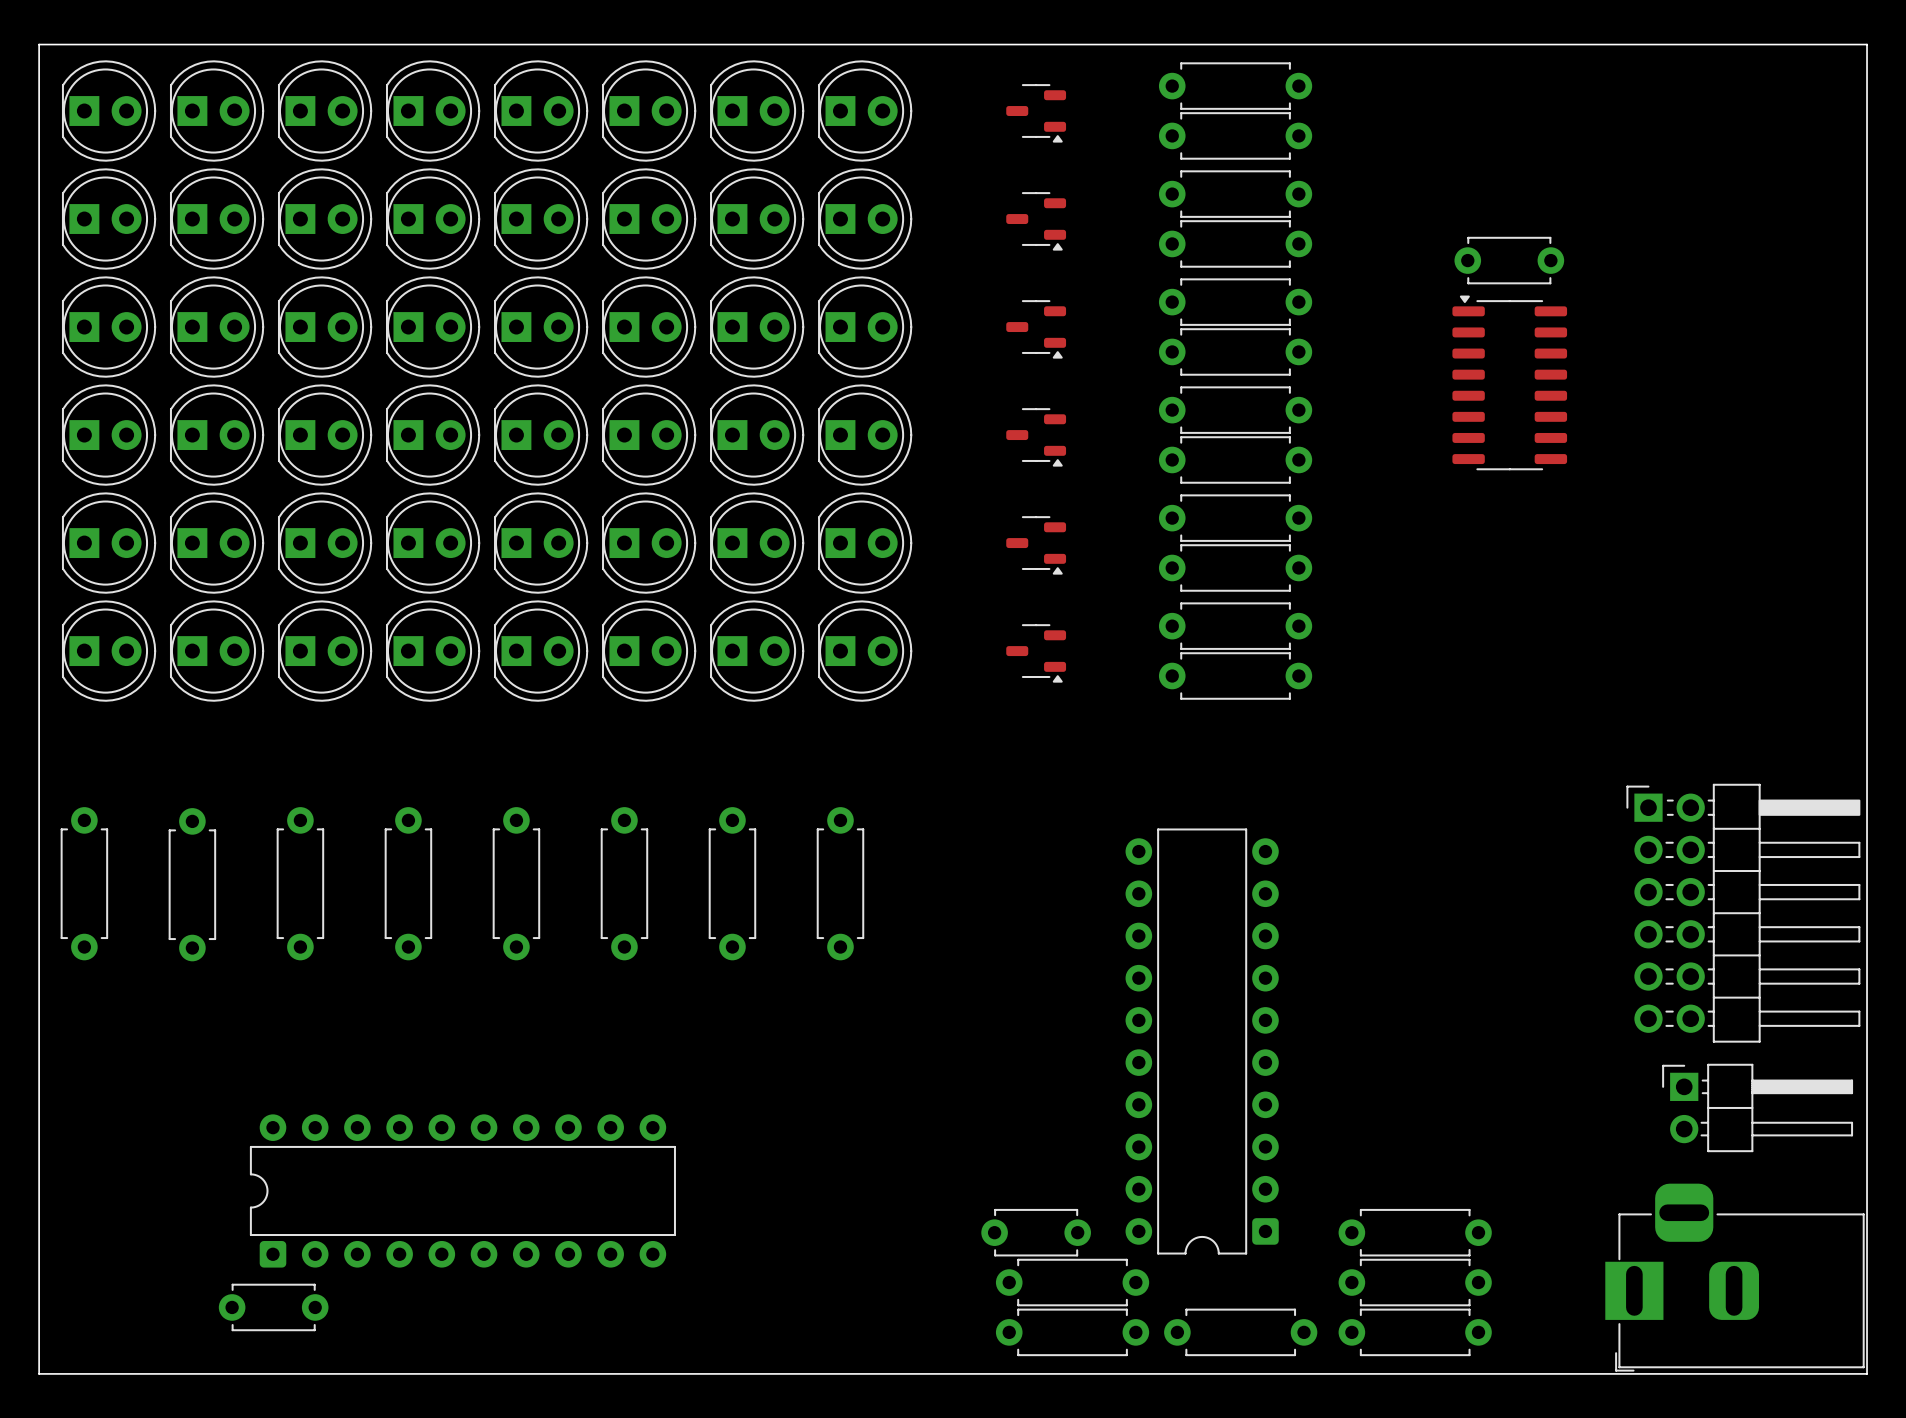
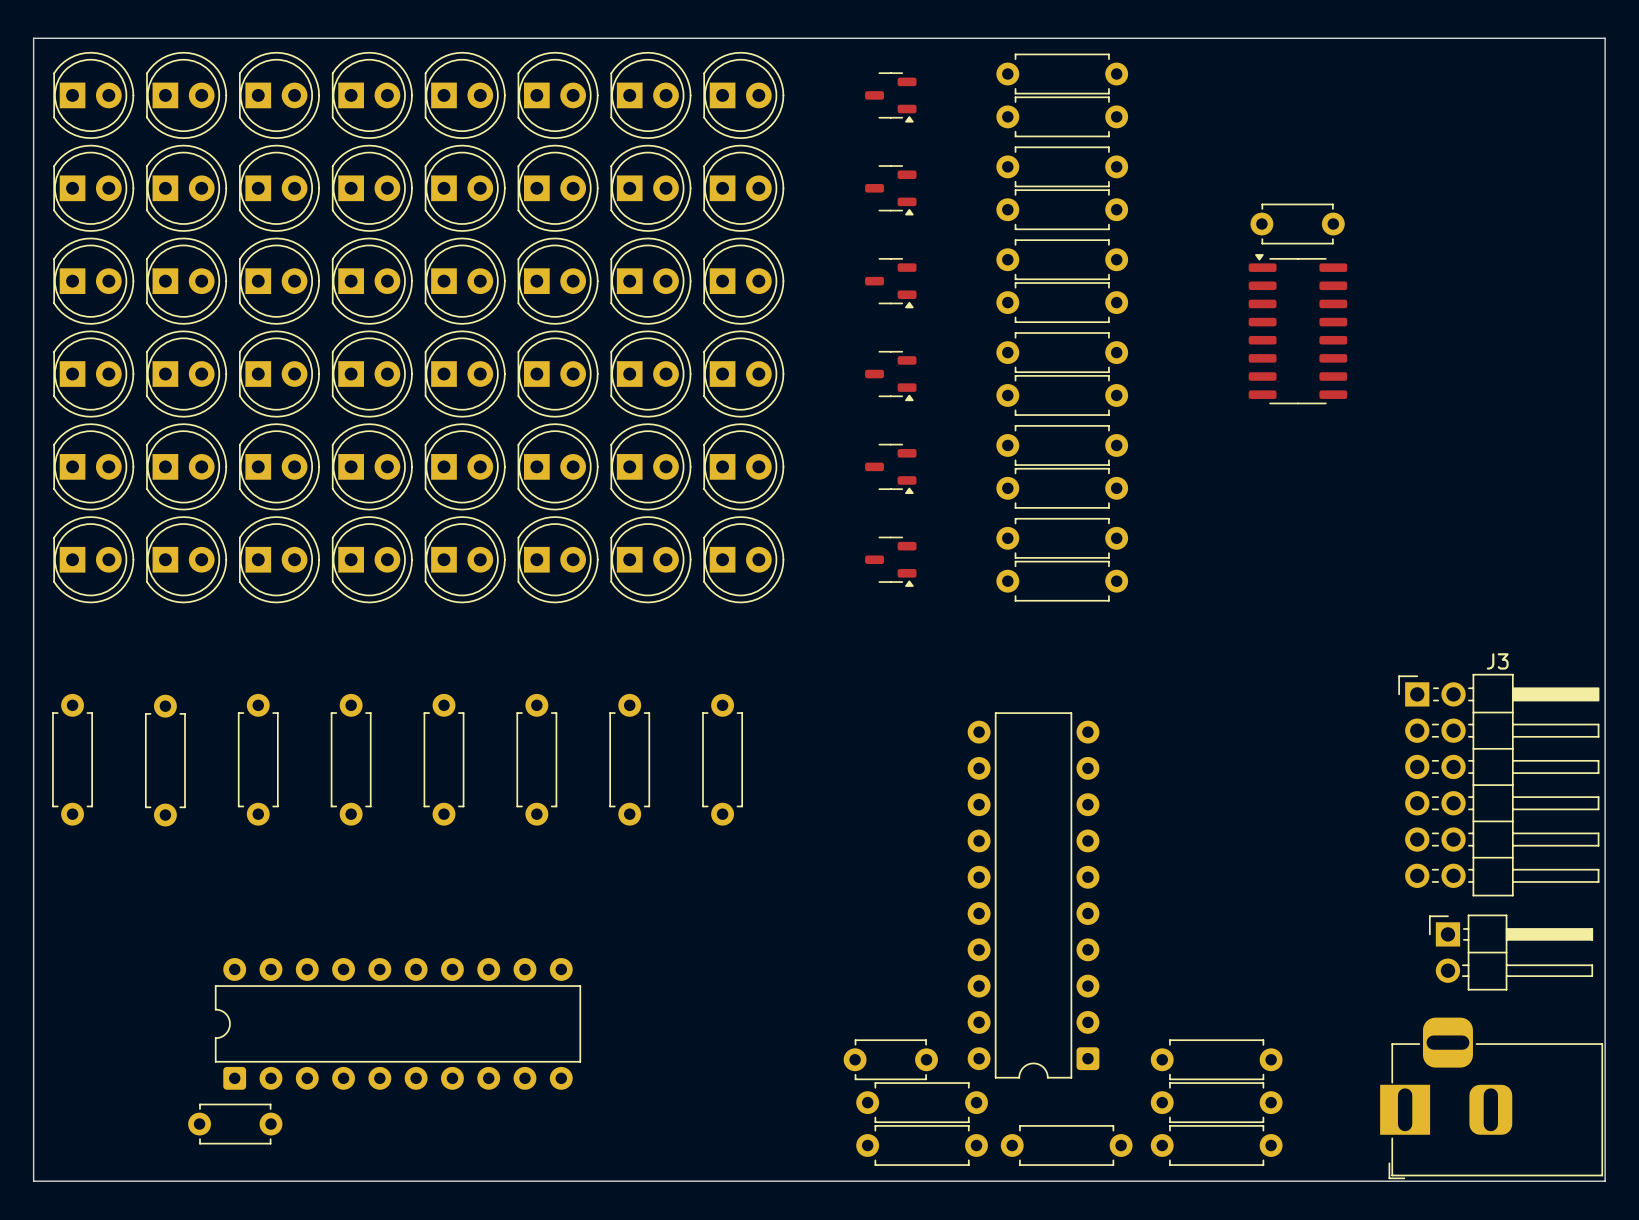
J3 name: none -> J3 (1497, 661)

